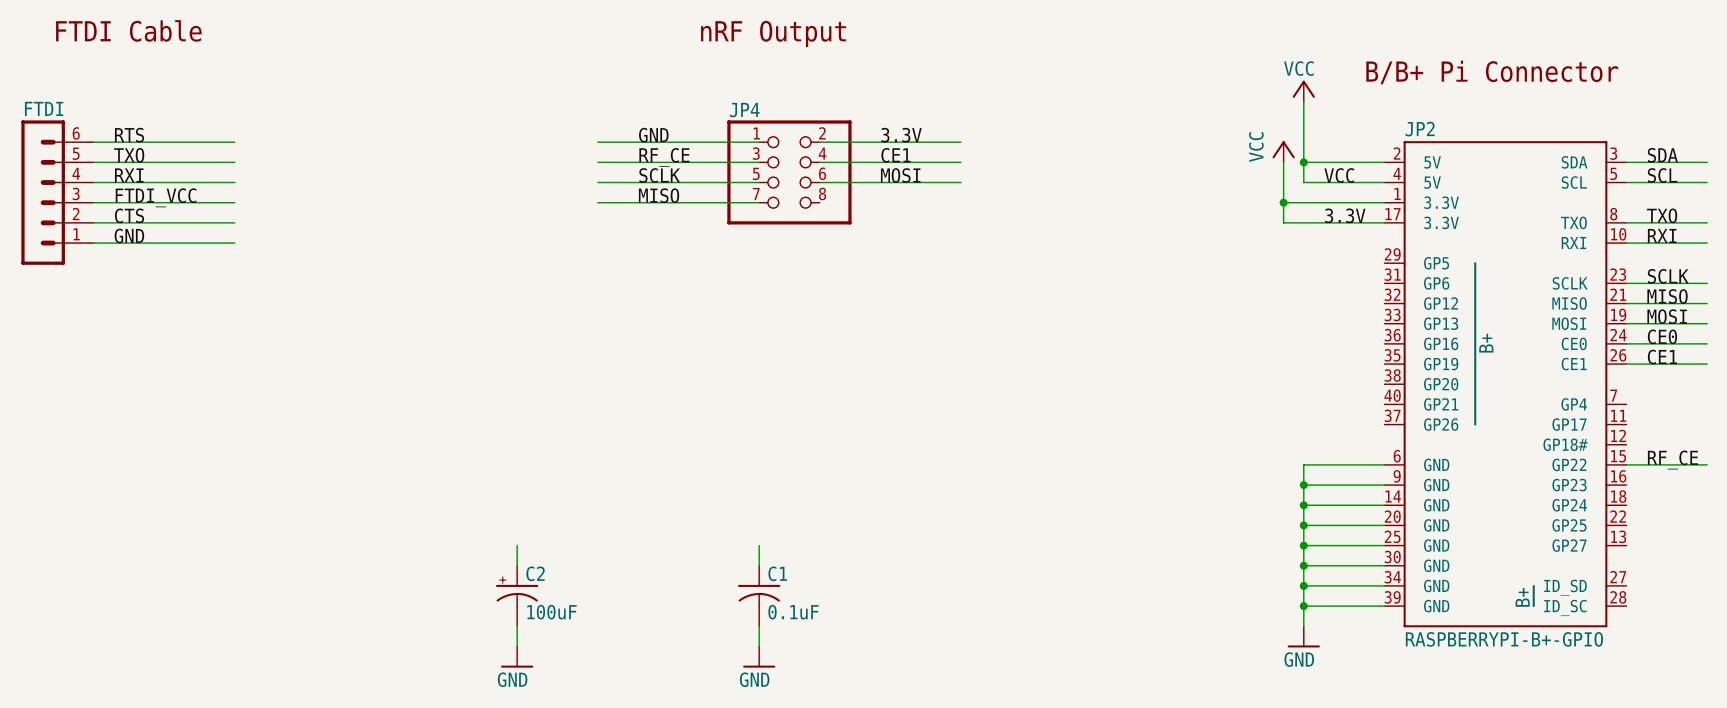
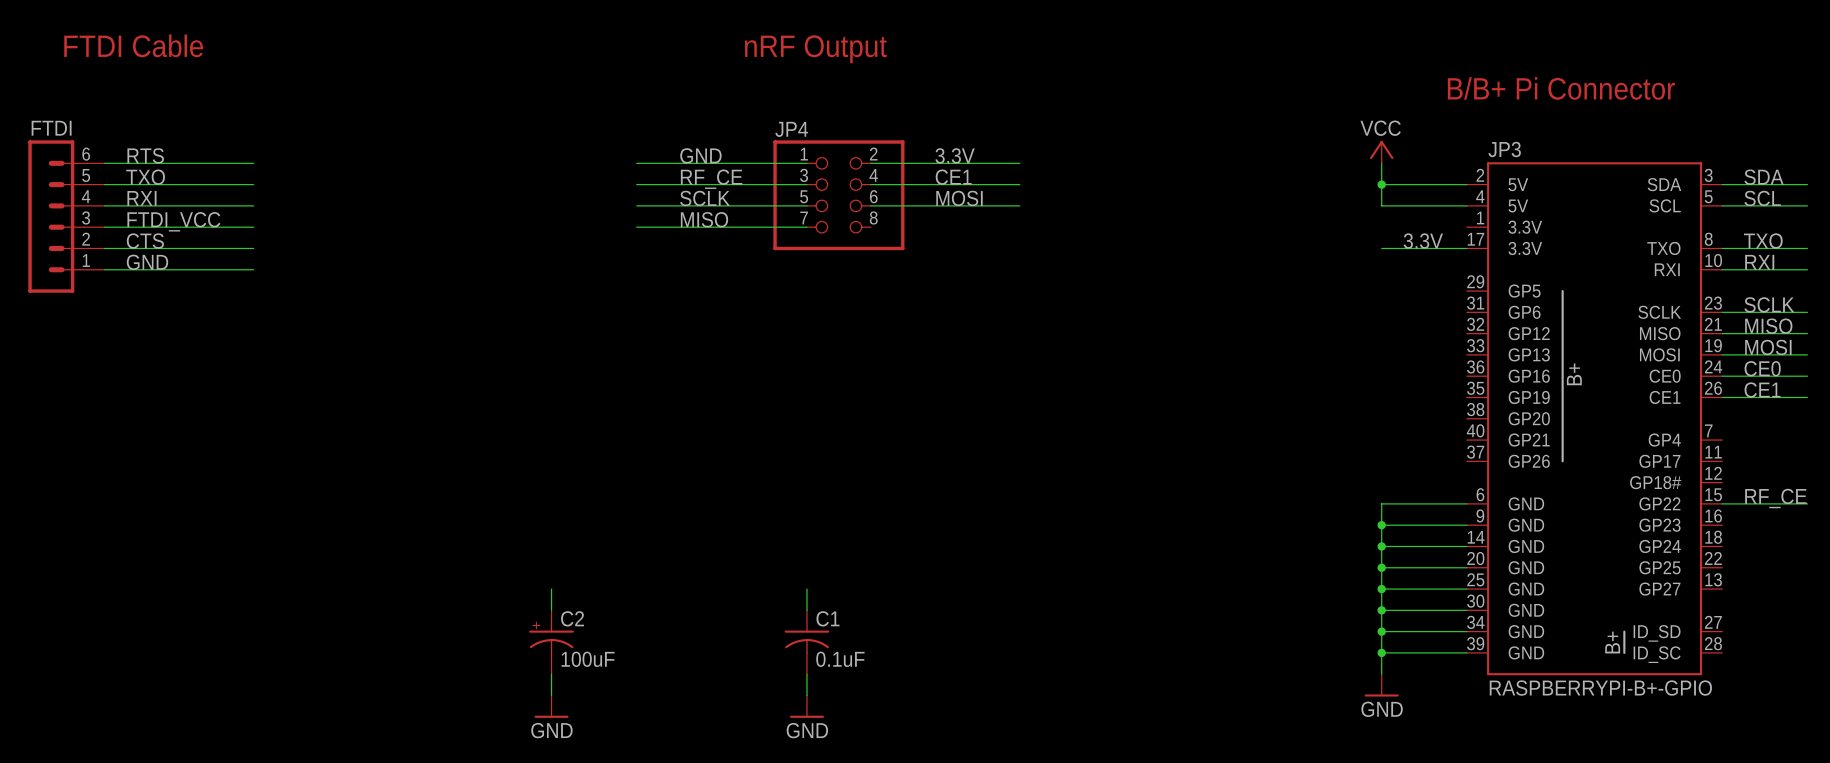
power symbol: VCC (1303, 91) -> none
JP2 name: JP2 (1420, 129) -> JP3 (1504, 149)
power symbol: none -> VCC (1381, 152)
power symbol: VCC (1283, 151) -> none
wire: (1283, 162) (1283, 222) (1303, 222) -> none
label: VCC (1339, 175) -> none
wire: (1283, 202) (1384, 202) -> none
junction: (1283, 202) -> none

